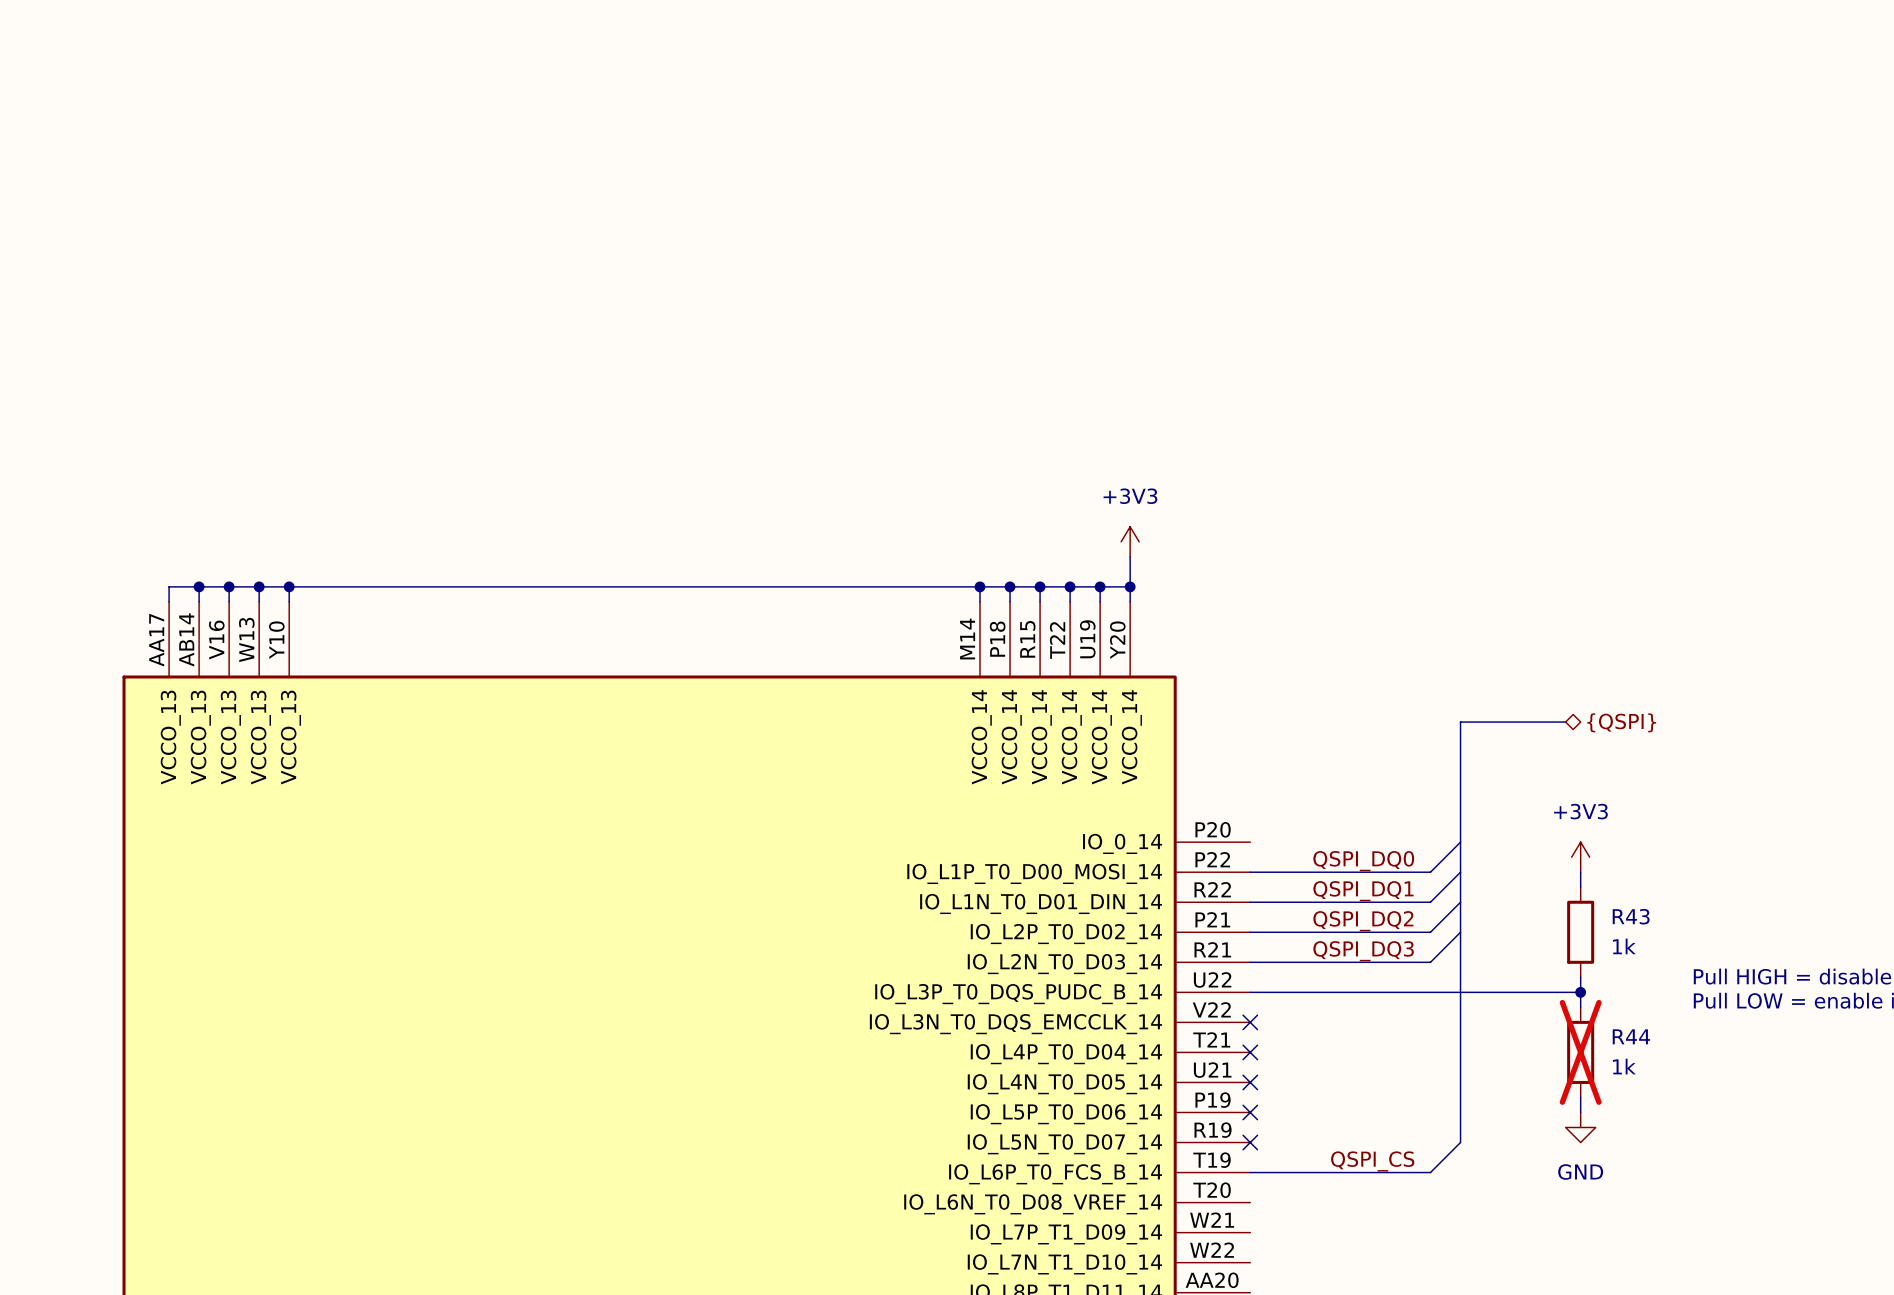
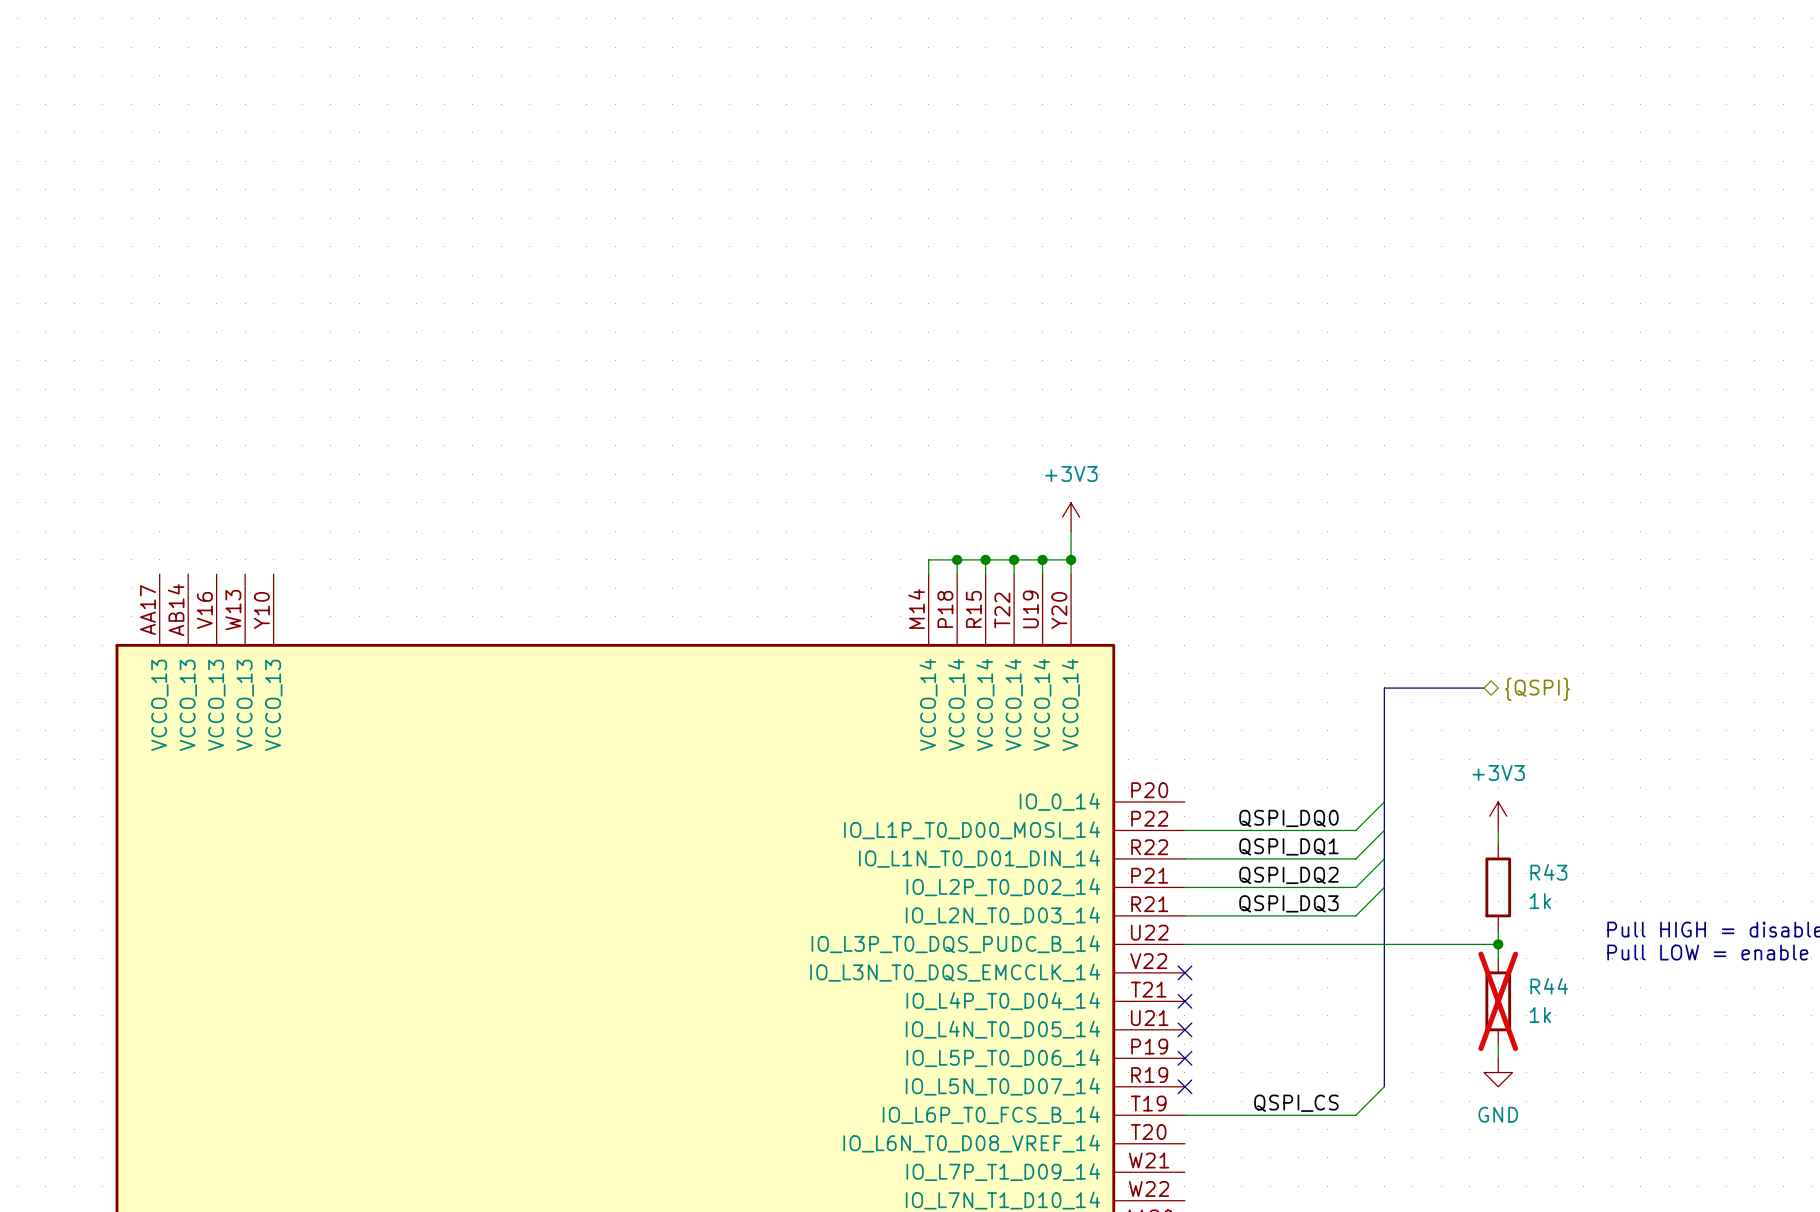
wire: (199, 586) (199, 601) -> none
junction: (199, 586) -> none
wire: (229, 586) (229, 601) -> none
junction: (229, 586) -> none
wire: (259, 586) (259, 601) -> none
junction: (259, 586) -> none
wire: (289, 586) (289, 601) -> none
junction: (289, 586) -> none
wire: (979, 586) (169, 586) (169, 601) -> none
junction: (979, 586) -> none

